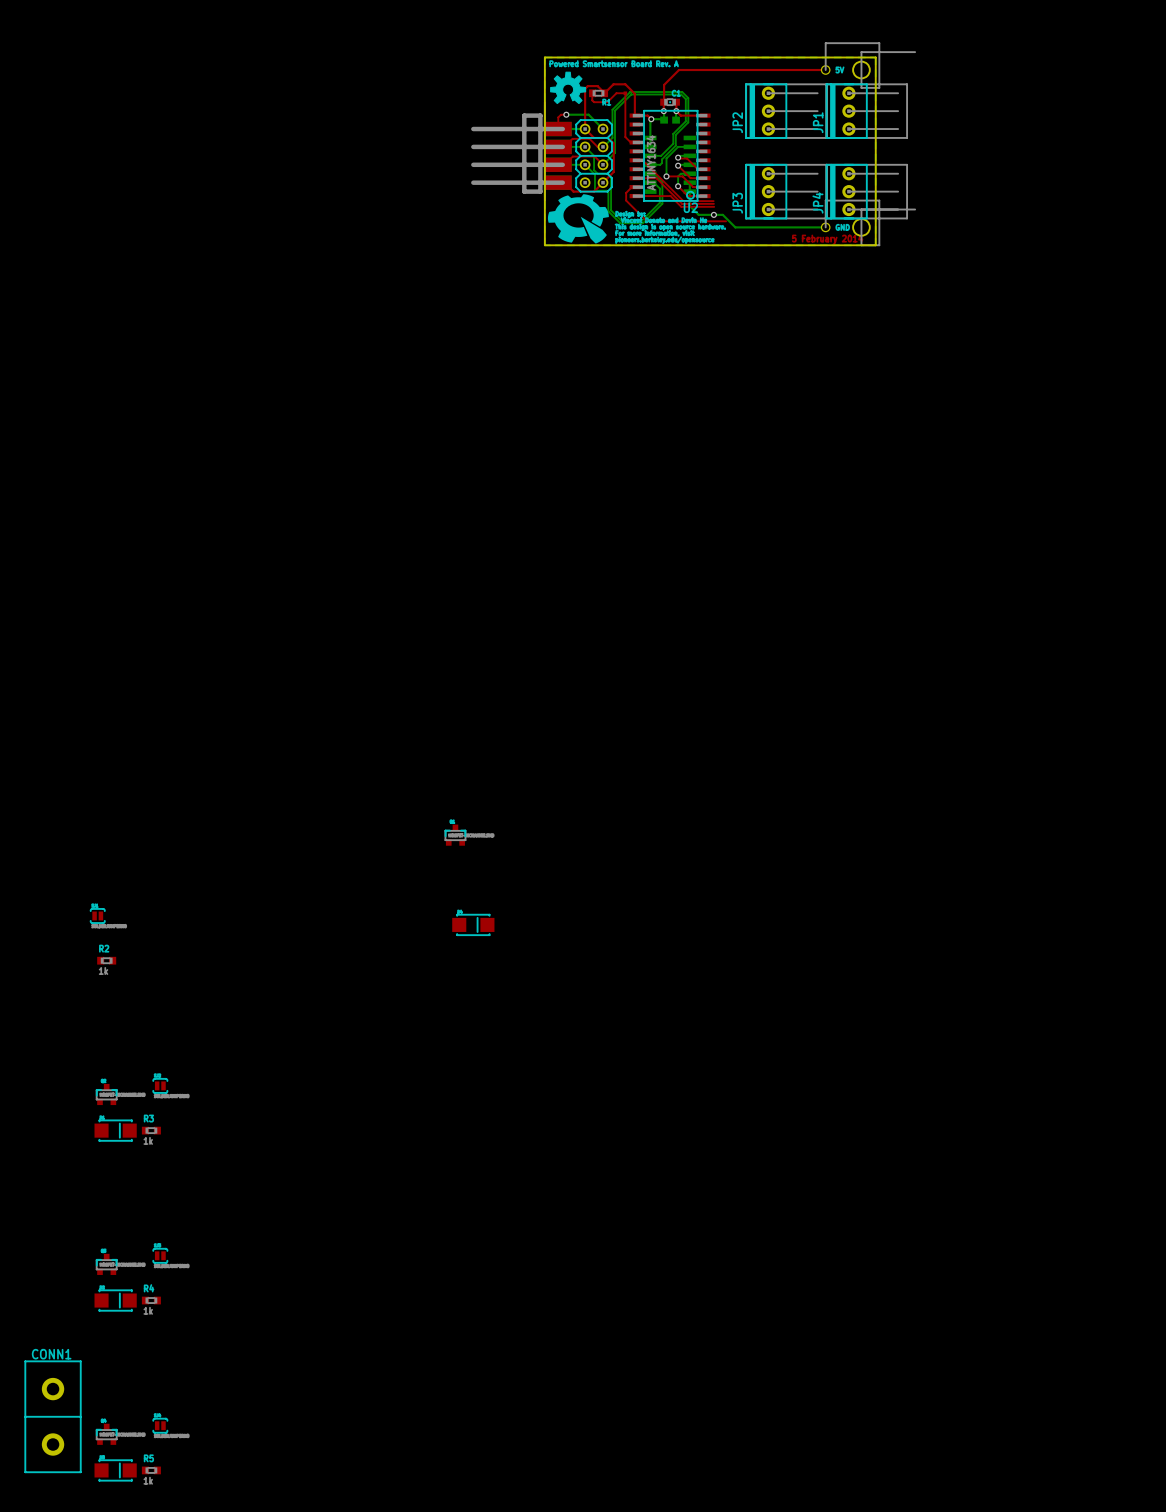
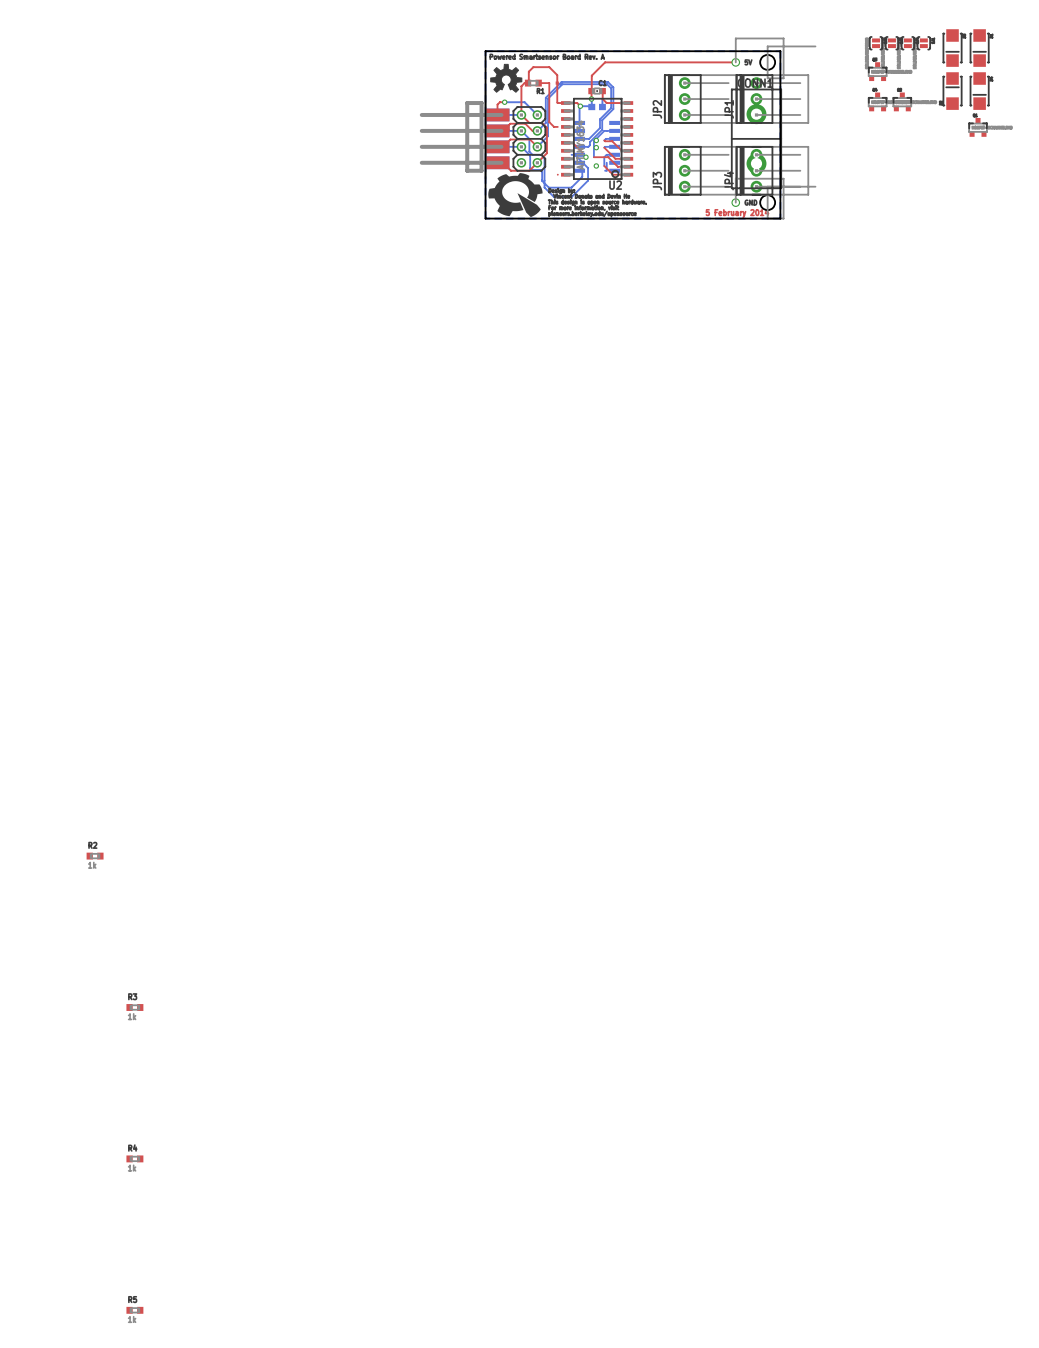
top track: (592, 93) (594, 102) (607, 102) (616, 93) (625, 93) -> (521, 86) (524, 83) (528, 83) (528, 71) (533, 67) (549, 67) (557, 75) (557, 83)
top track: none -> (539, 83) (549, 83) (549, 122) (554, 126) (557, 126)
top track: (585, 96) (585, 88) (587, 86) (597, 86) (604, 93) (613, 84) (625, 84) (634, 93) (634, 115) -> none
via: (676, 111) -> none
top track: (625, 115) (625, 137) (630, 142) (634, 142) -> (557, 102) (565, 103)
via: none -> (596, 140)
via: (678, 157) -> none
via: none -> (596, 147)
via: (678, 165) -> none
top track: (653, 171) (683, 201) (713, 201) -> none
bottom track: none -> (571, 154) (574, 154) (582, 162) (582, 176) (571, 187)
bottom track: (650, 173) (653, 173) (662, 182) (662, 203) (642, 223) (620, 223) (608, 211) (608, 202) -> (571, 187) (548, 187) (542, 180)
via: none -> (585, 157)
via: (666, 176) -> none
top track: (638, 178) (656, 178) (682, 203) (713, 203) -> none
bottom track: none -> (606, 162) (606, 170) (605, 170)
bottom track: (689, 182) (689, 205) (698, 214) (722, 214) (735, 227) (825, 227) -> none
via: none -> (596, 165)
via: (678, 186) -> none
top track: (631, 188) (626, 192) (626, 200) (646, 221) (726, 221) -> none
top track: (634, 196) (670, 196) (681, 206) (714, 206) -> none
via: (713, 214) -> none
part position: (455, 835) -> (978, 127)
part rotation: 0° (97, 915) -> 90° clockwise (923, 43)
part position: (97, 915) -> (923, 43)
part rotation: 0° (473, 924) -> 90° clockwise (979, 91)
part position: (473, 924) -> (979, 91)
part rotation: 0° (160, 1085) -> 90° clockwise (876, 43)
part position: (160, 1085) -> (876, 43)
part position: (106, 1094) -> (902, 101)
part rotation: 0° (115, 1130) -> 90° clockwise (979, 48)
part position: (115, 1130) -> (979, 48)
part rotation: 0° (160, 1255) -> 90° clockwise (891, 43)
part position: (160, 1255) -> (891, 43)
part position: (106, 1264) -> (877, 71)
part rotation: 0° (115, 1300) -> 90° counterclockwise (952, 91)
part position: (115, 1300) -> (952, 91)
CONN1 position: (53, 1416) -> (756, 138)
part rotation: 0° (160, 1425) -> 90° clockwise (907, 43)
part position: (160, 1425) -> (907, 43)
part position: (106, 1434) -> (877, 101)
part rotation: 0° (115, 1470) -> 90° clockwise (952, 48)
part position: (115, 1470) -> (952, 48)

